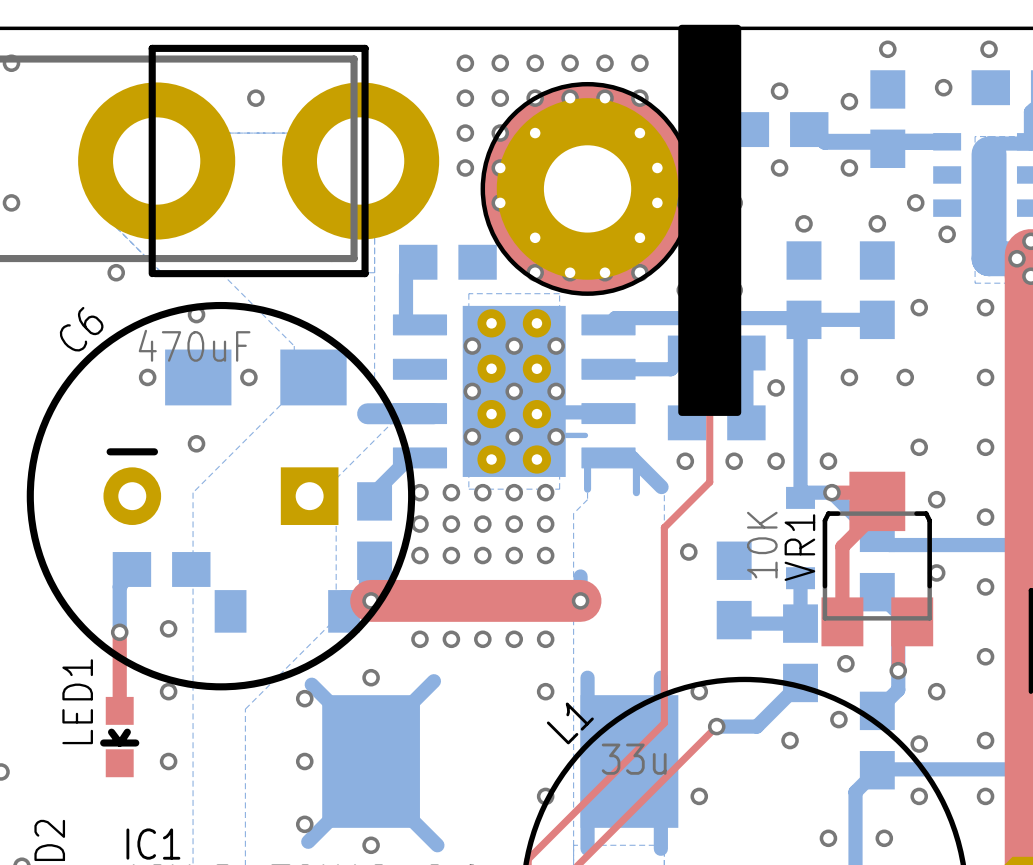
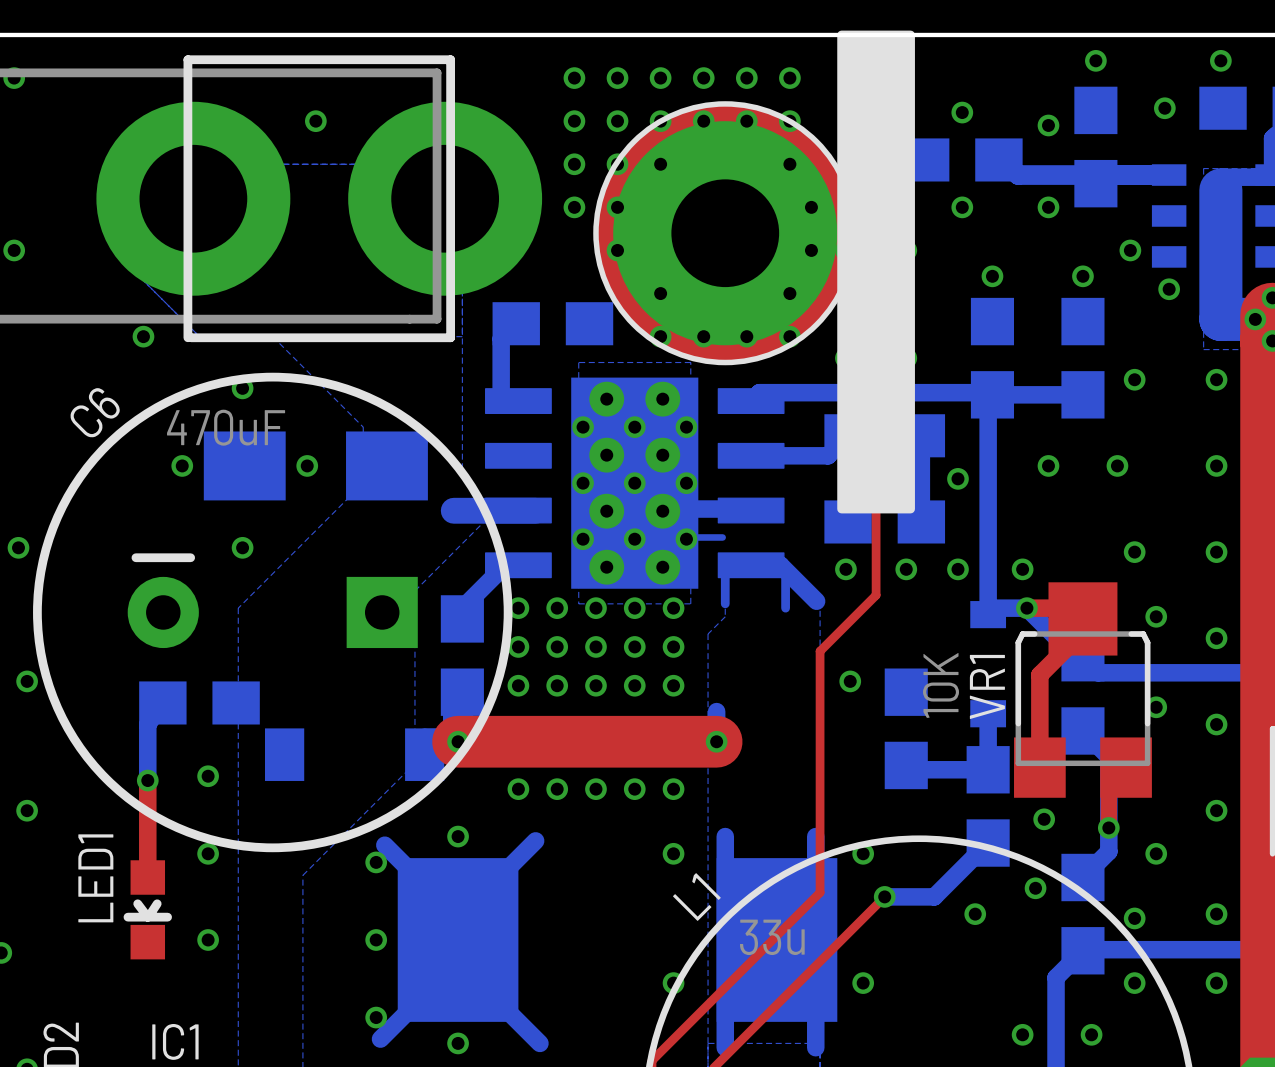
via: none -> (18, 547)
via: none -> (27, 681)
via: none -> (27, 810)

